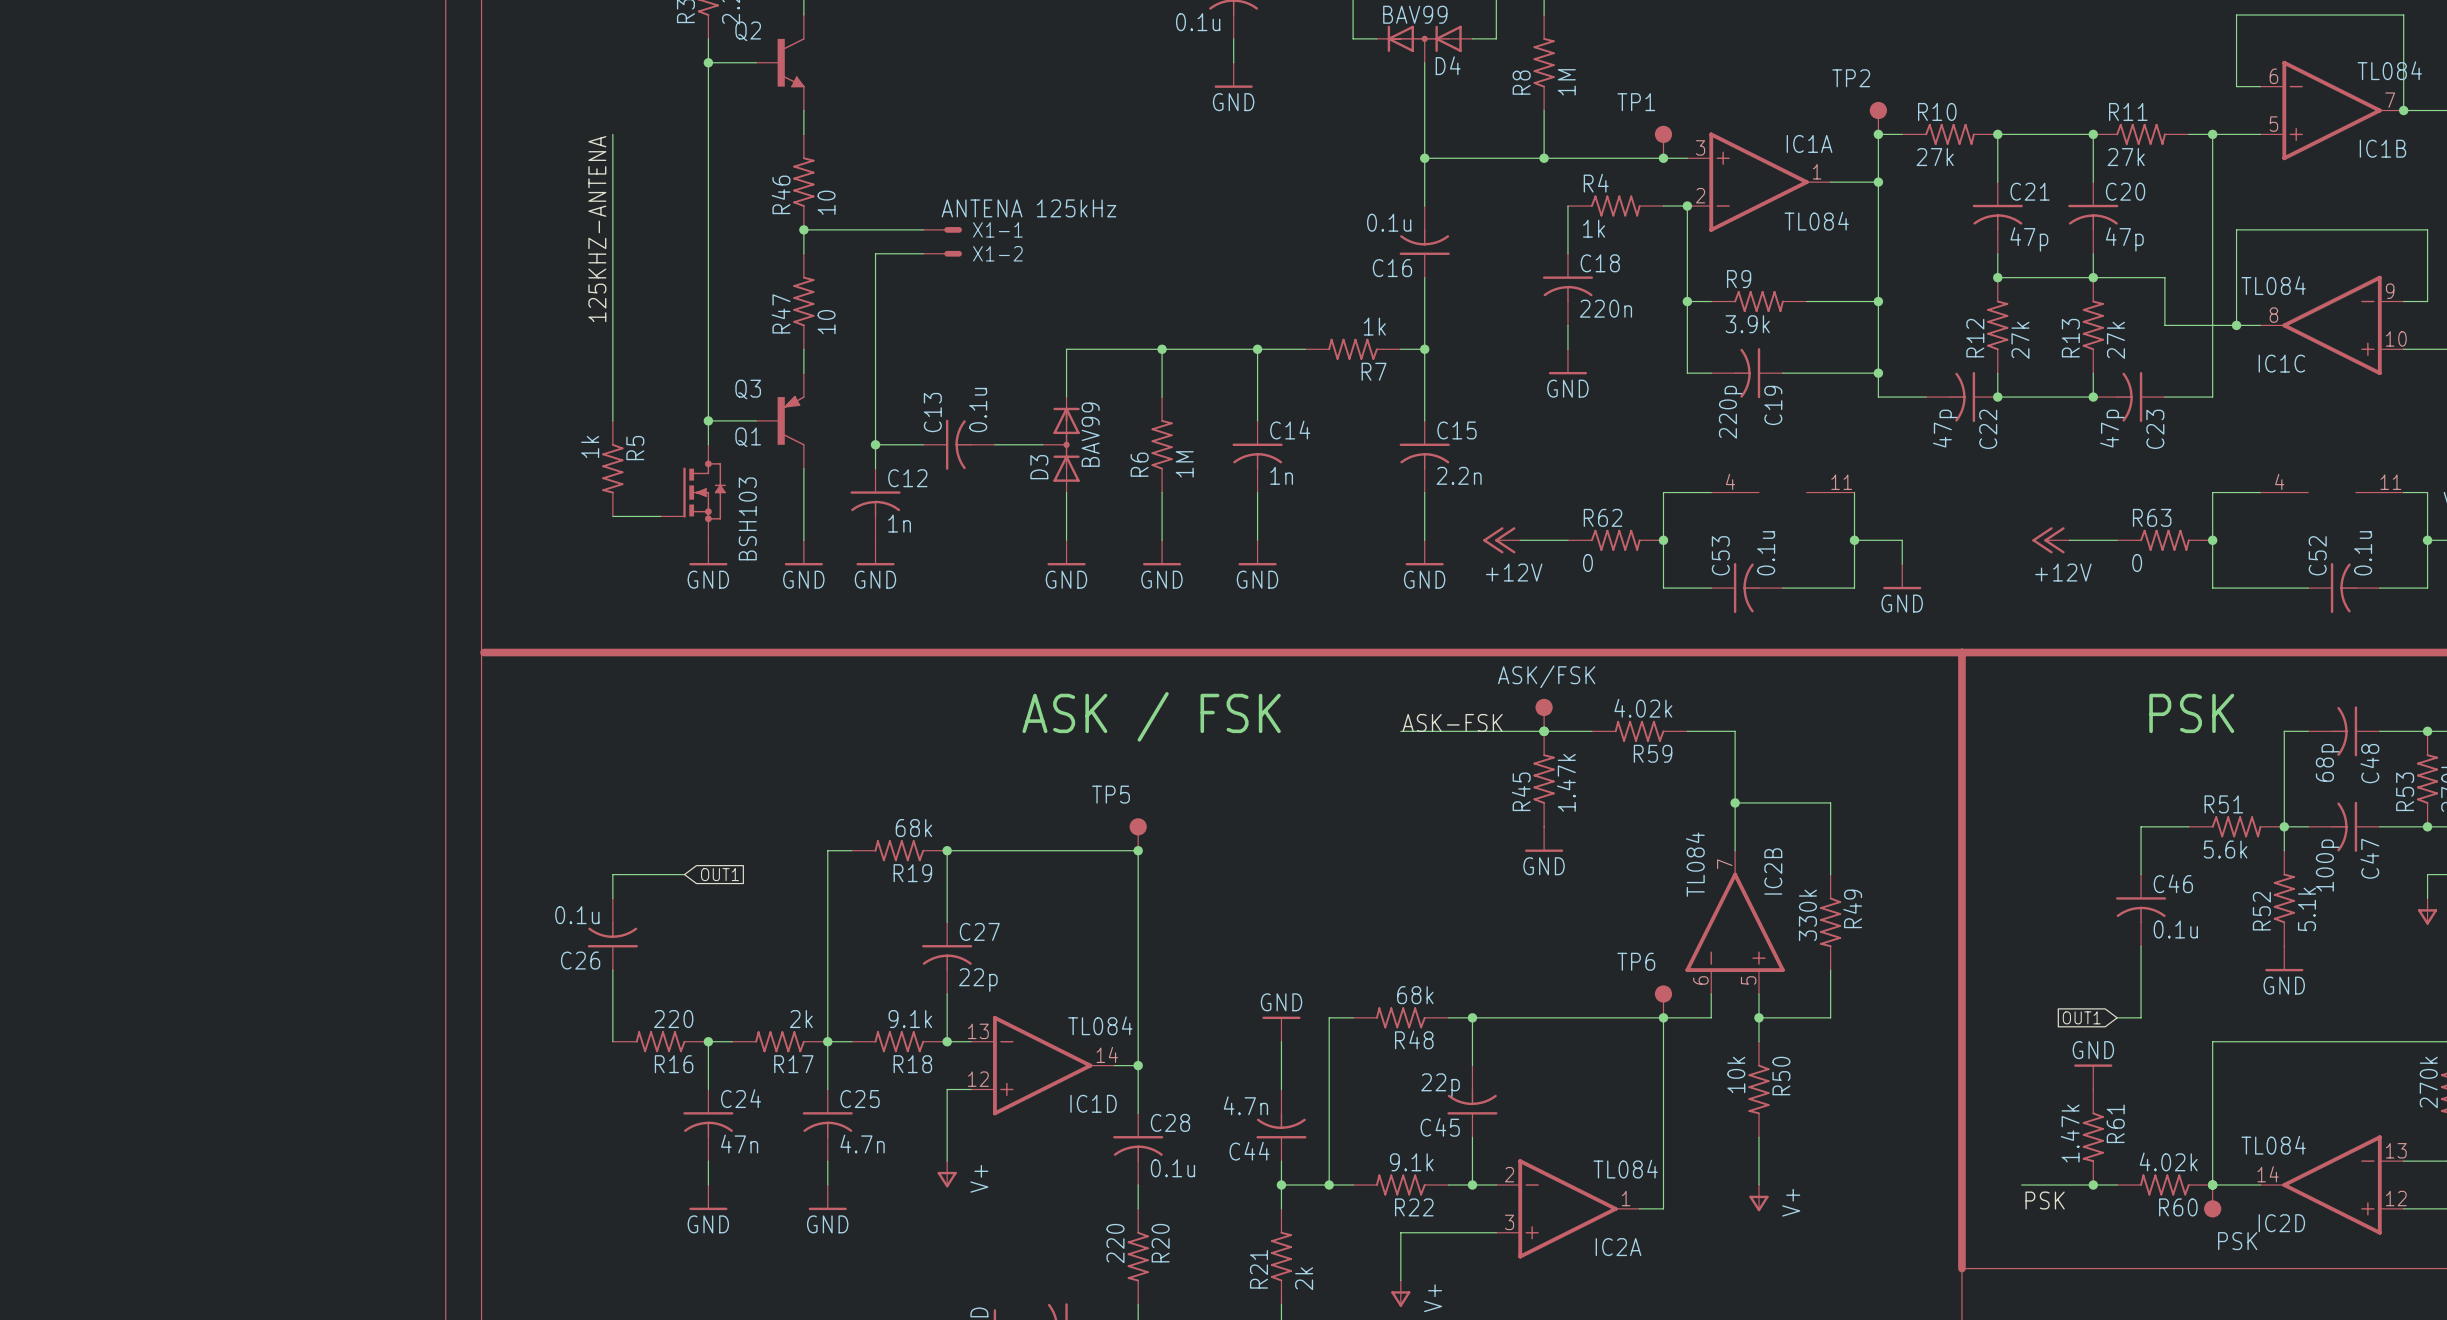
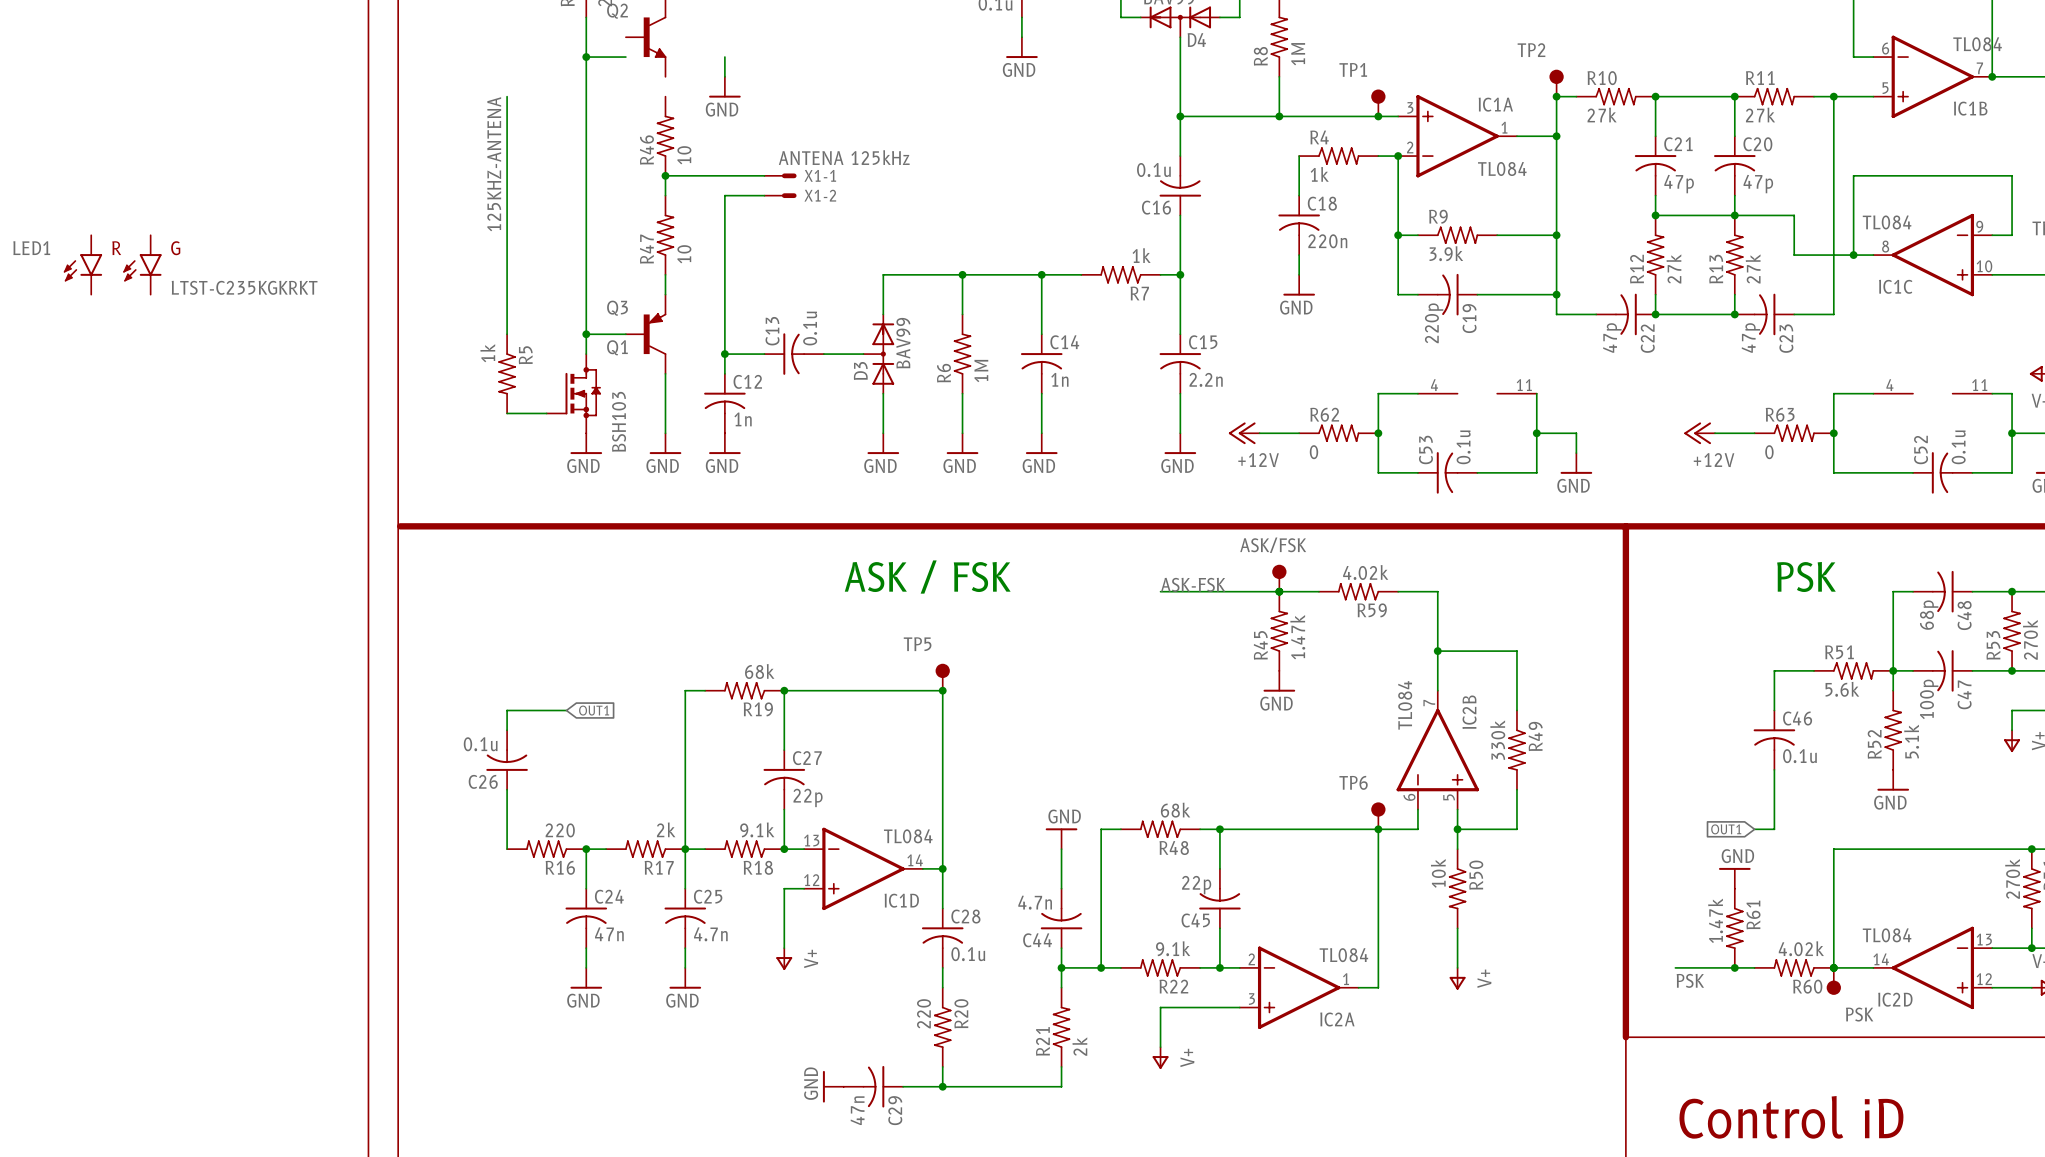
wire: (708, 62) (756, 62) -> (586, 57) (625, 57)
junction position: (708, 62) -> (586, 57)
wire: (803, 110) (803, 134) -> (724, 57) (724, 76)
power symbol: none -> GND (724, 87)
LED1: none -> LTST-C235KGKRKT (112, 264)

